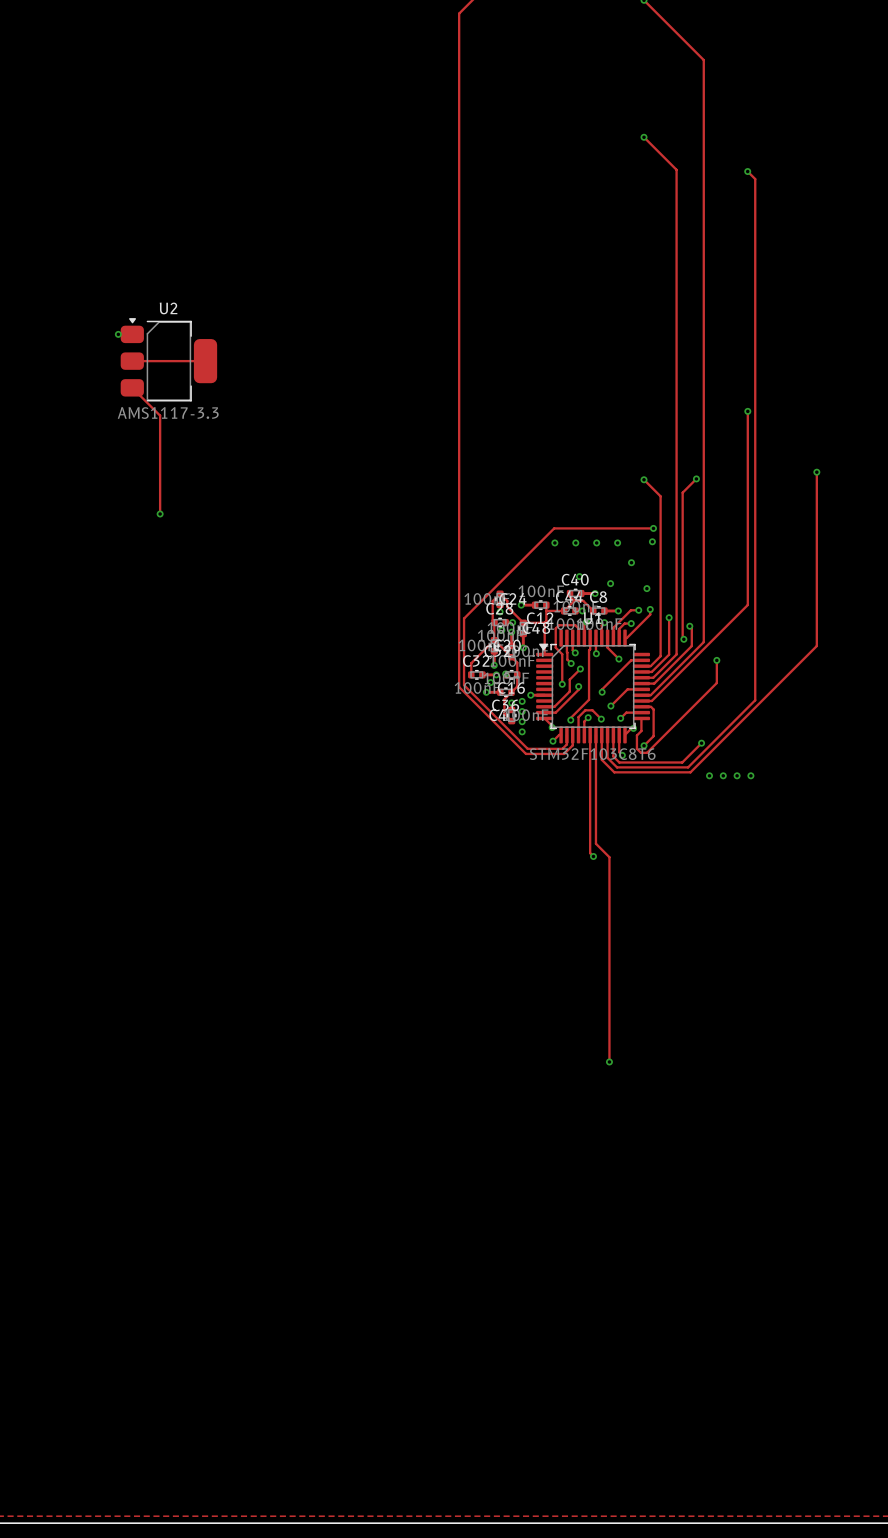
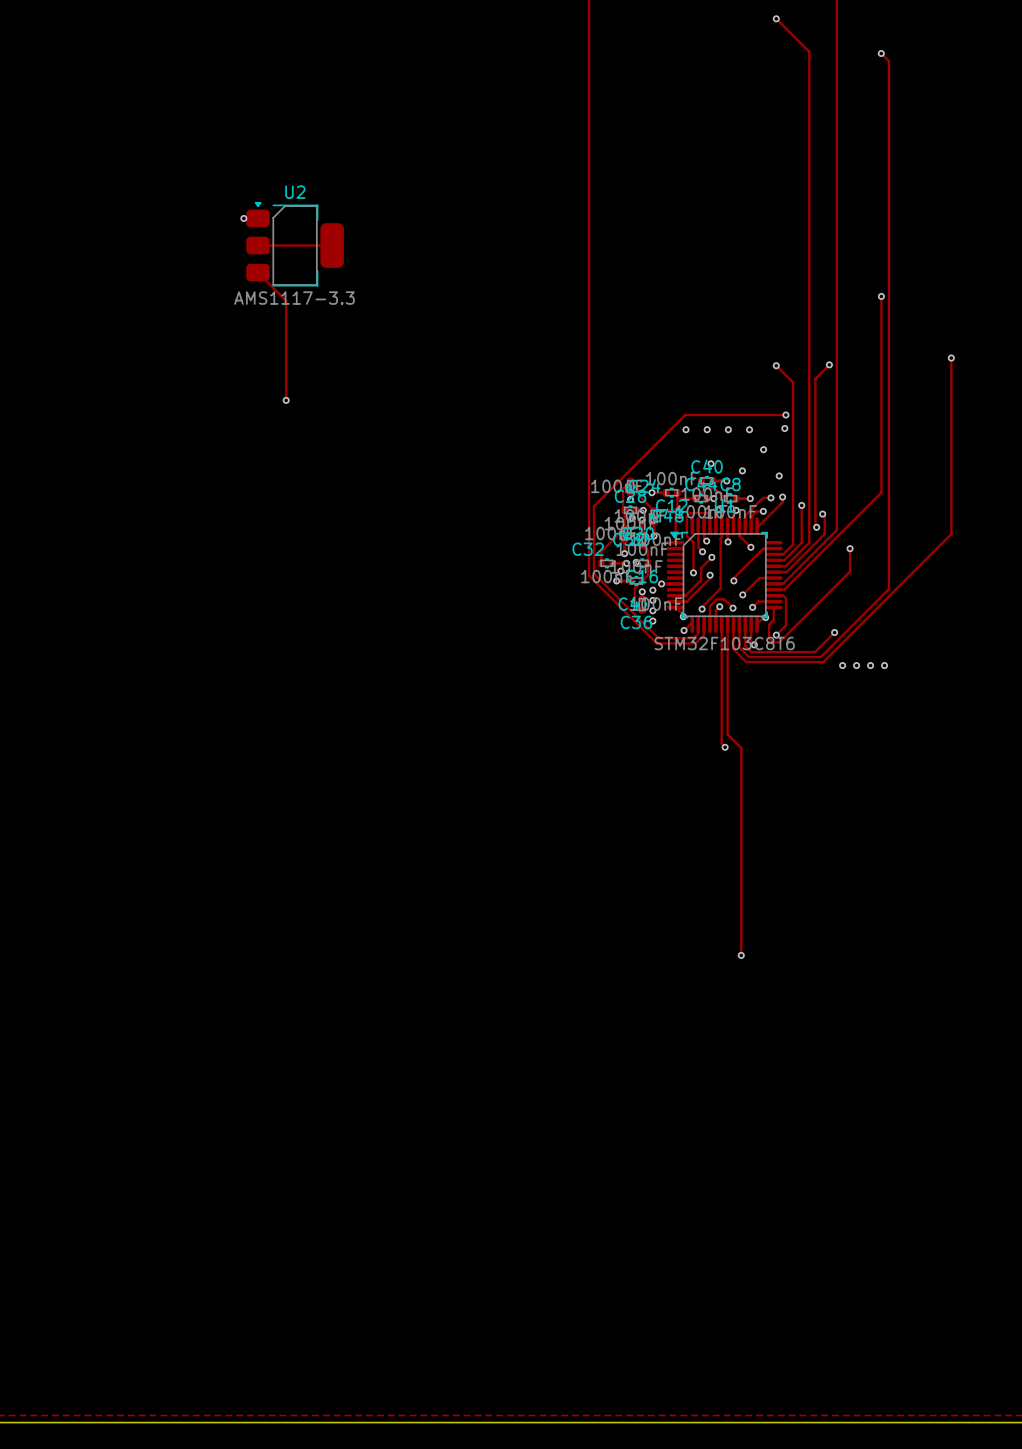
C32 name position: C32 (476, 661) -> C32 (588, 549)
C36 name position: C36 (505, 705) -> C36 (636, 622)

